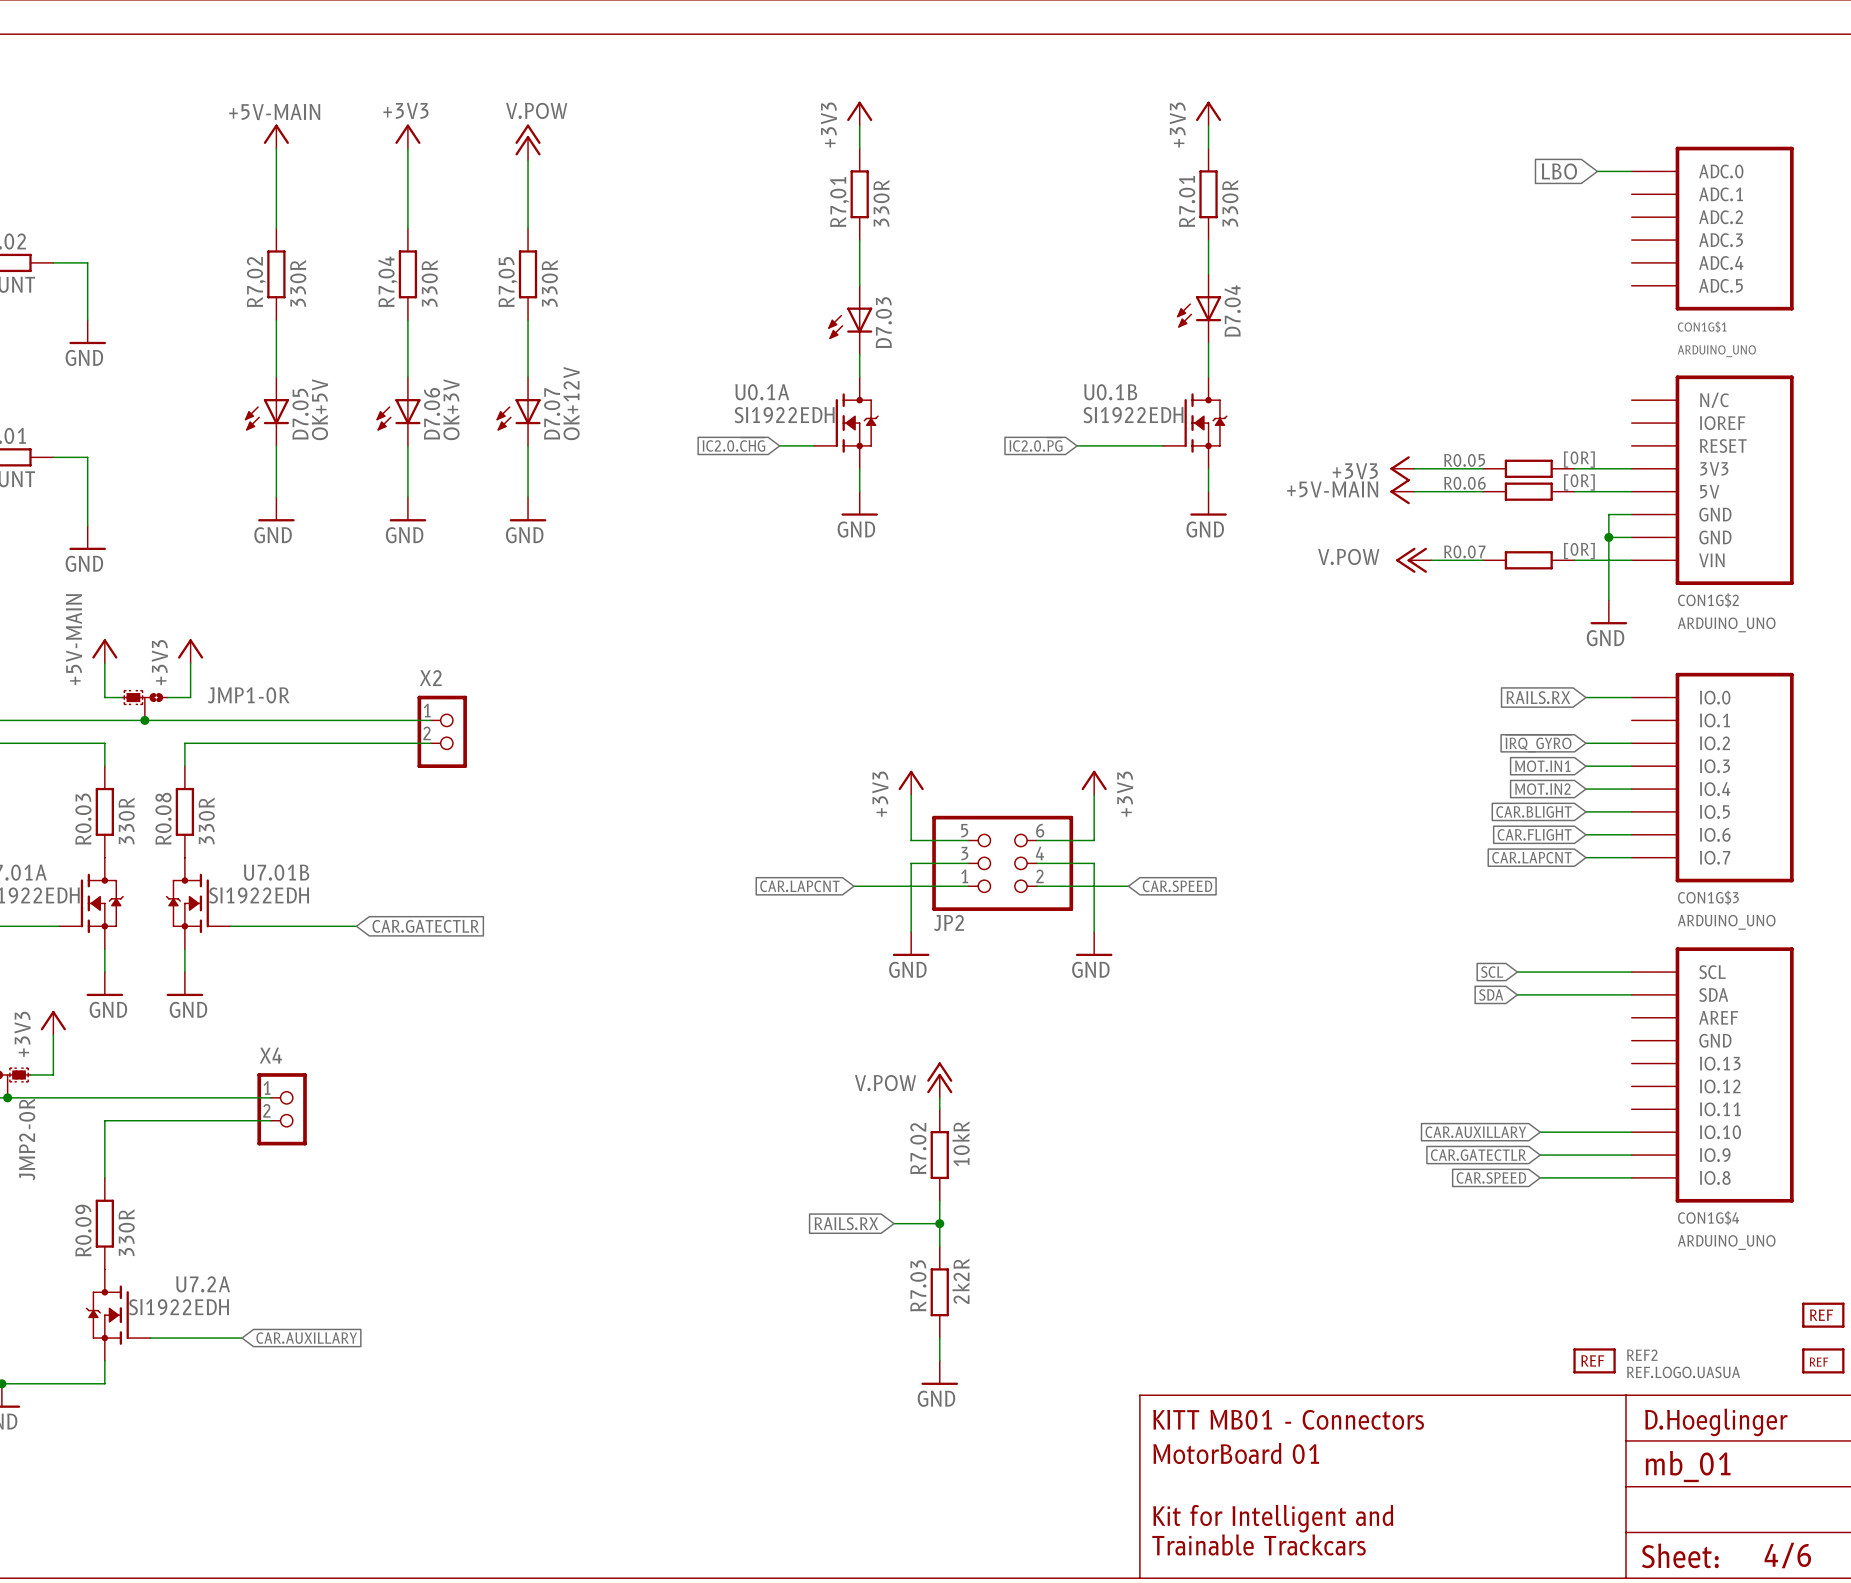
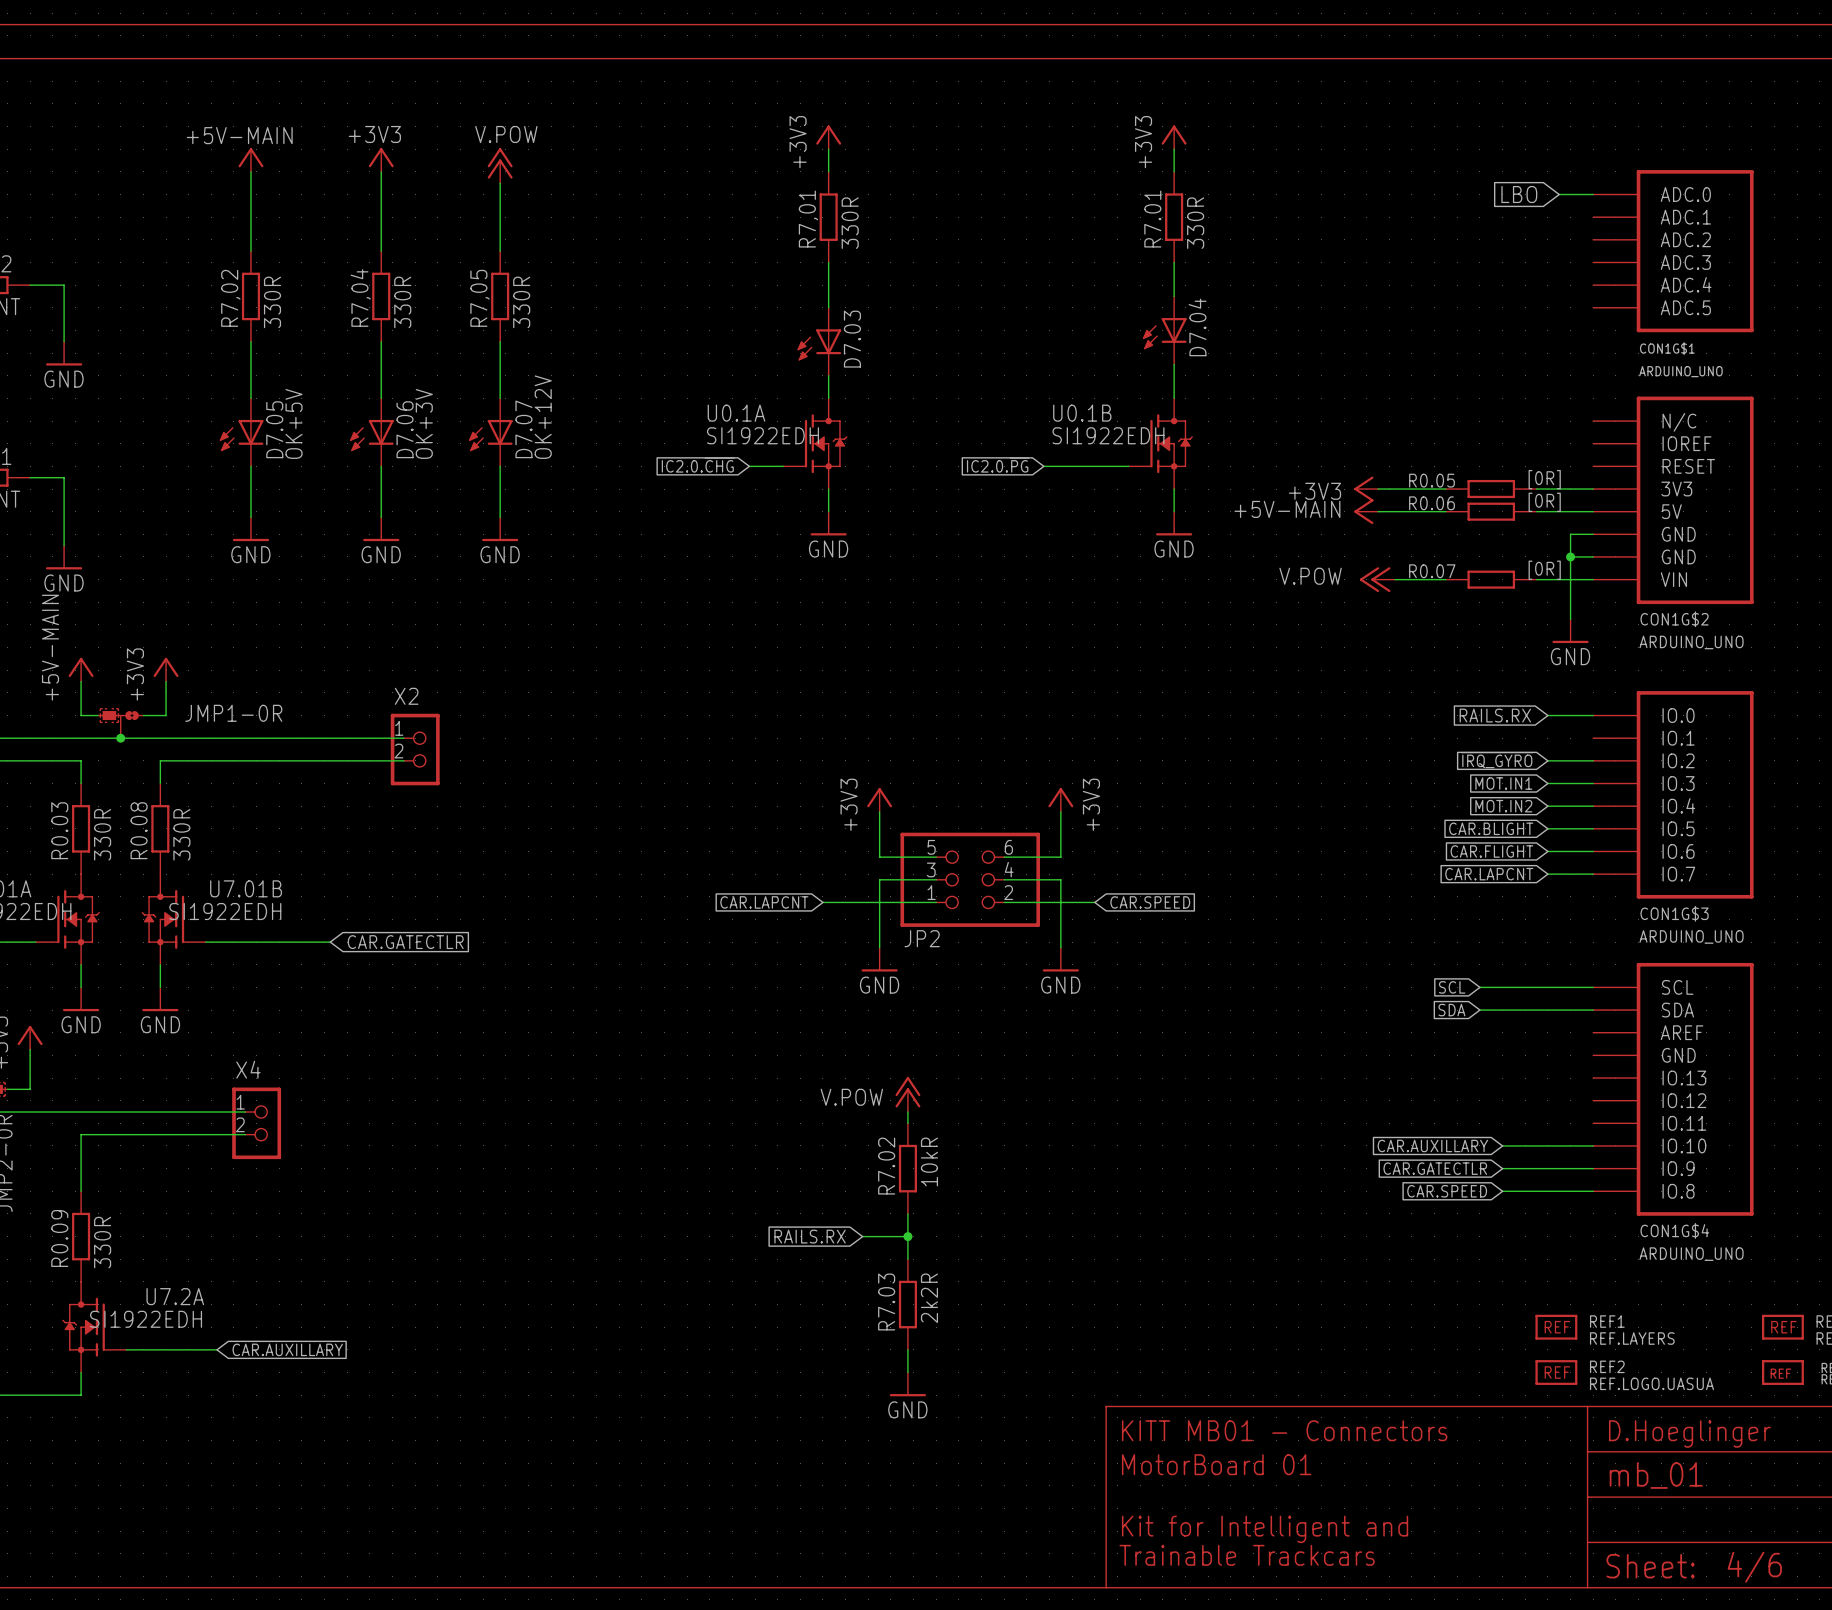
REF1: none -> REF.LAYERS (1556, 1327)

